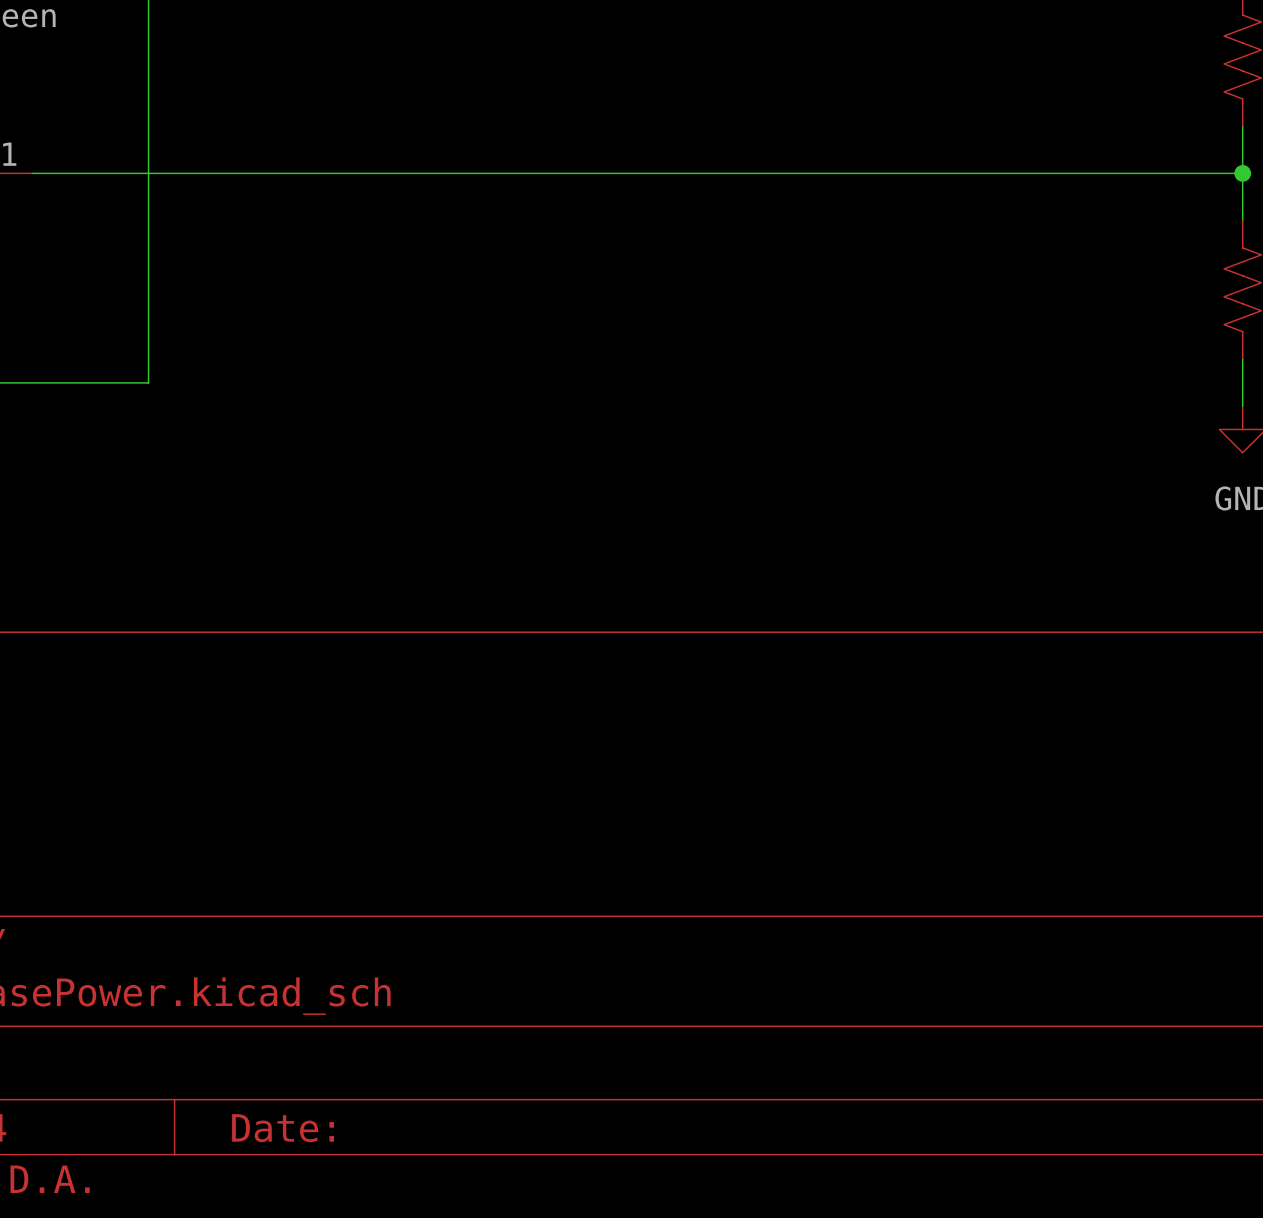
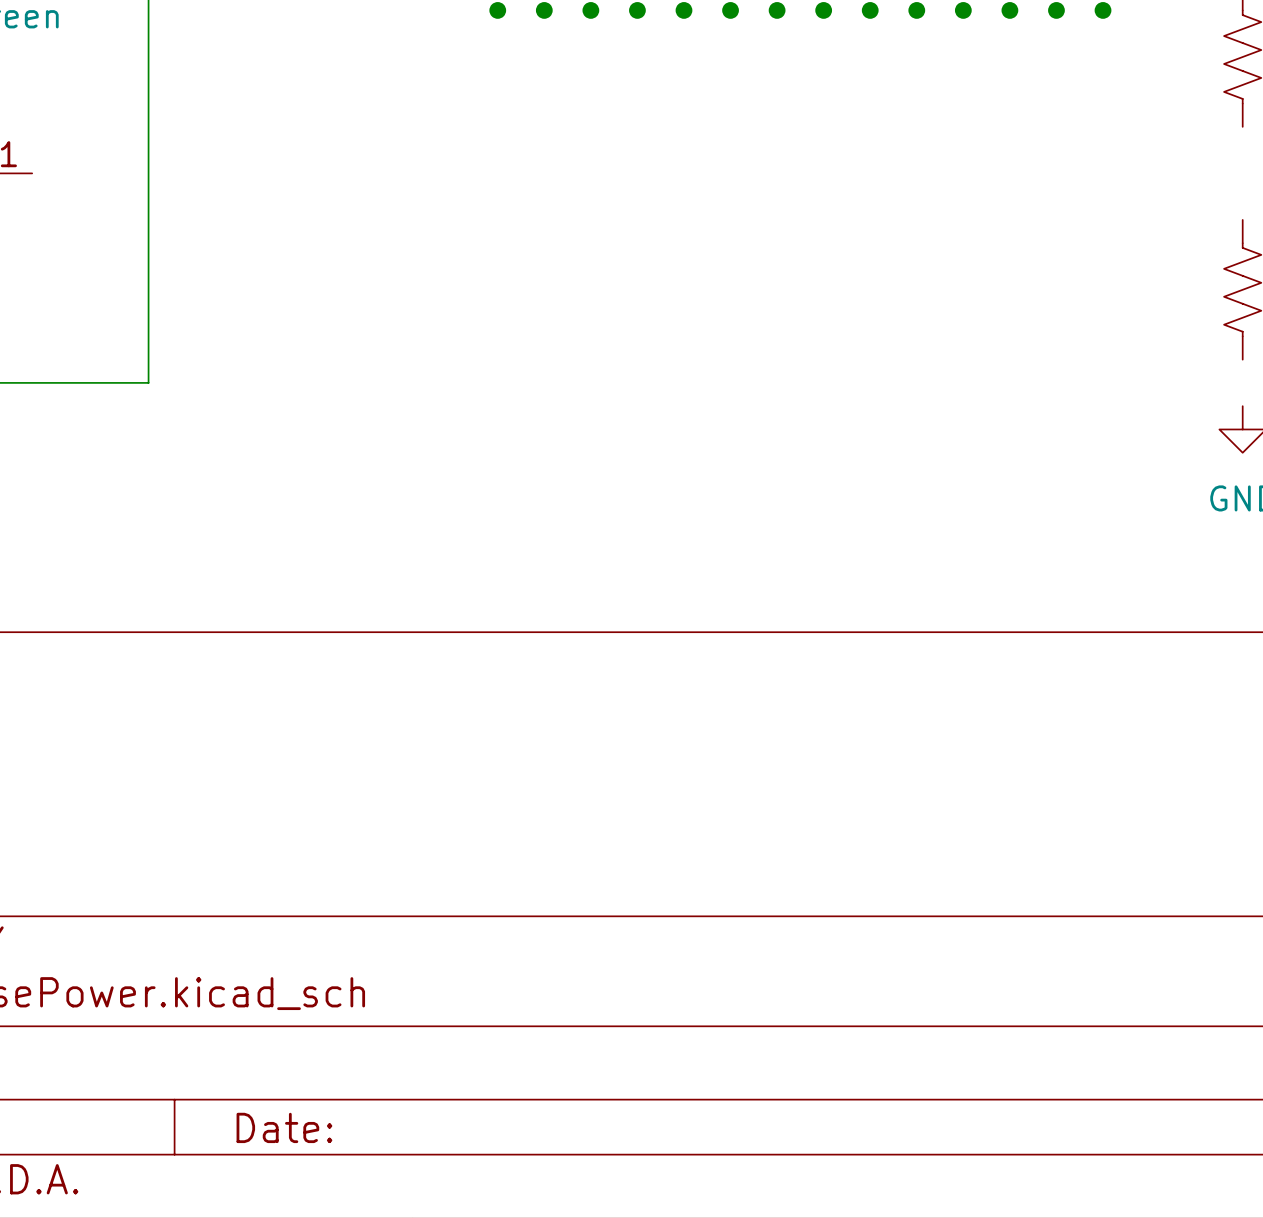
junction: none -> (497, 10)
junction: none -> (544, 10)
junction: none -> (590, 10)
junction: none -> (637, 10)
junction: none -> (683, 10)
junction: none -> (730, 10)
junction: none -> (777, 10)
junction: none -> (823, 10)
junction: none -> (870, 10)
junction: none -> (916, 10)
junction: none -> (963, 10)
junction: none -> (1009, 10)
junction: none -> (1056, 10)
junction: none -> (1103, 10)
wire: (1242, 126) (1242, 219) -> none
wire: (32, 173) (1242, 173) -> none
junction: (1242, 173) -> none
wire: (1242, 359) (1242, 406) -> none

